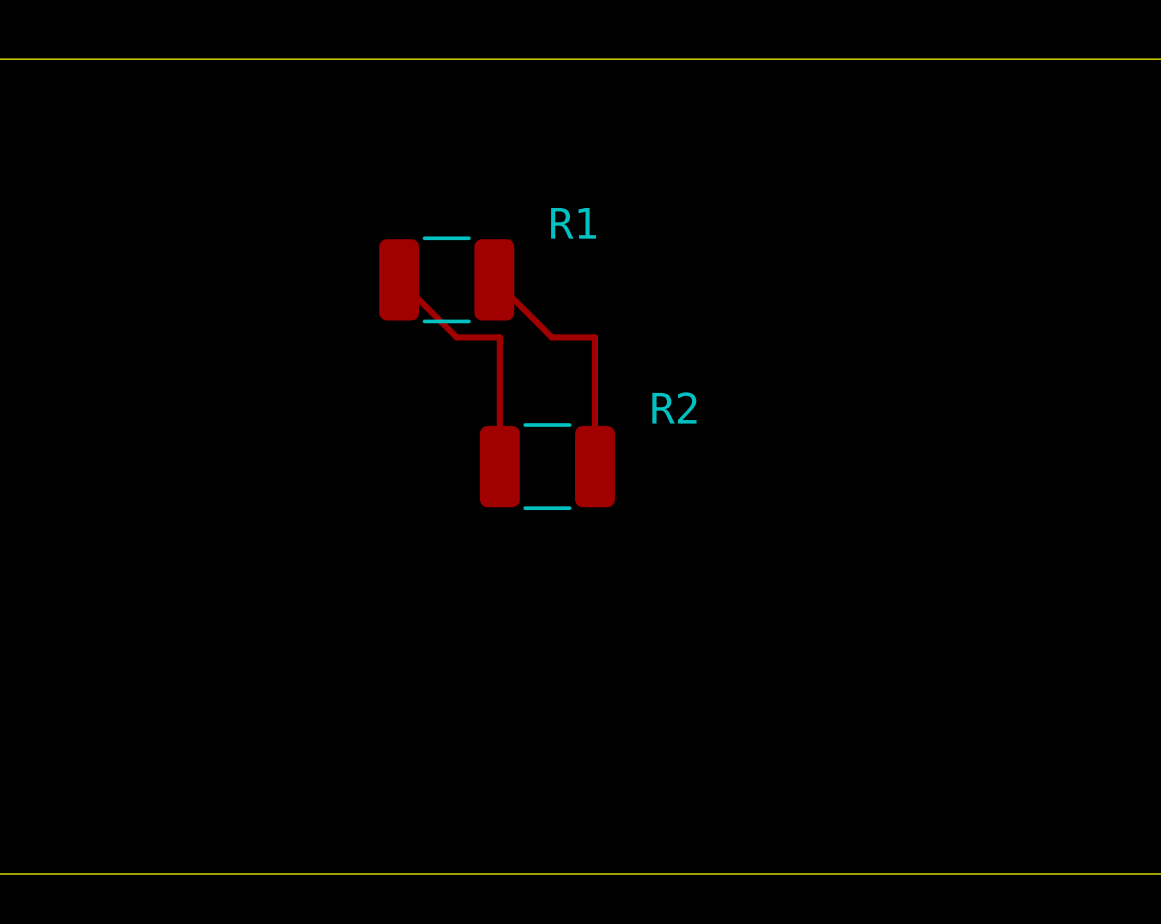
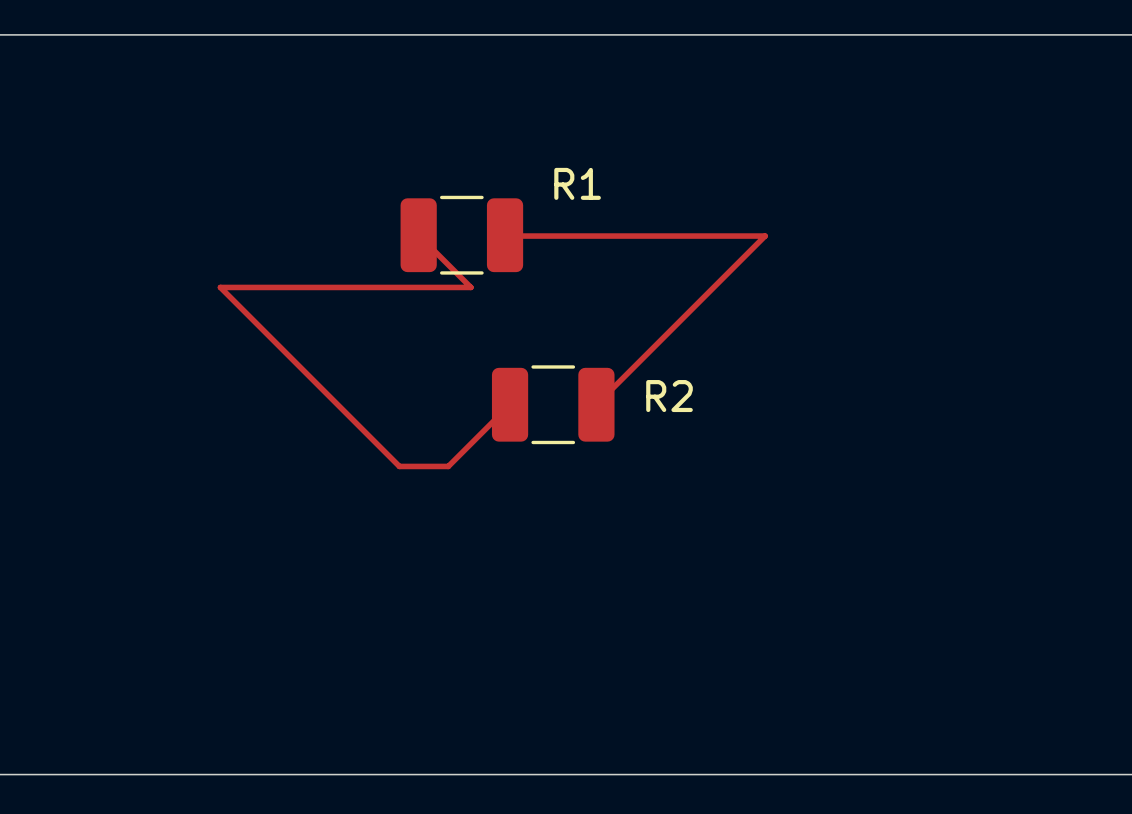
top track: (495, 280) (551, 337) (594, 337) (594, 466) -> (505, 236) (765, 236) (596, 404)
top track: (456, 337) (499, 337) (499, 466) -> (470, 287) (220, 287) (399, 466) (448, 466) (510, 404)
R2 name position: R2 (674, 407) -> R2 (669, 396)

